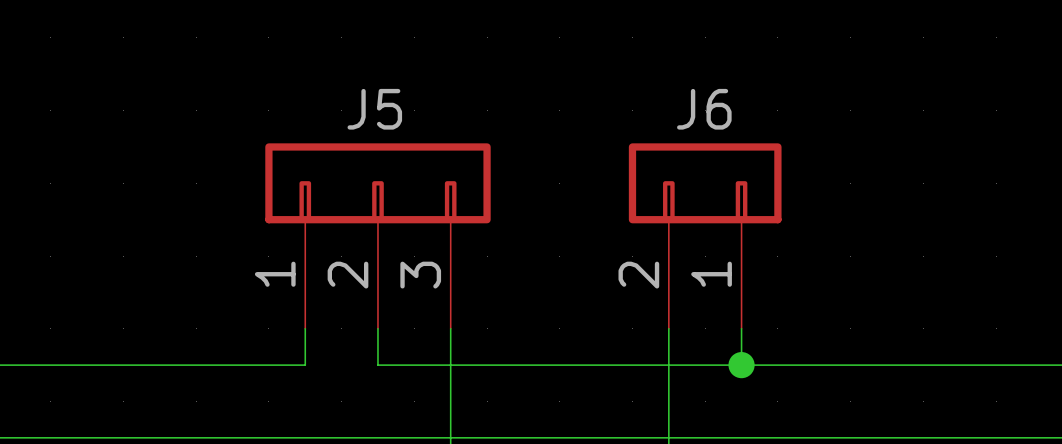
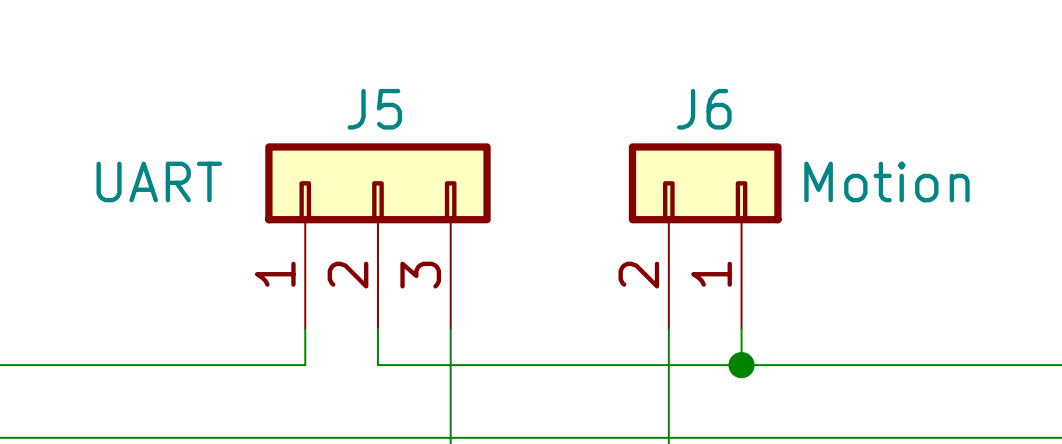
J5 value: none -> UART (159, 181)
J6 value: none -> Motion (886, 181)

